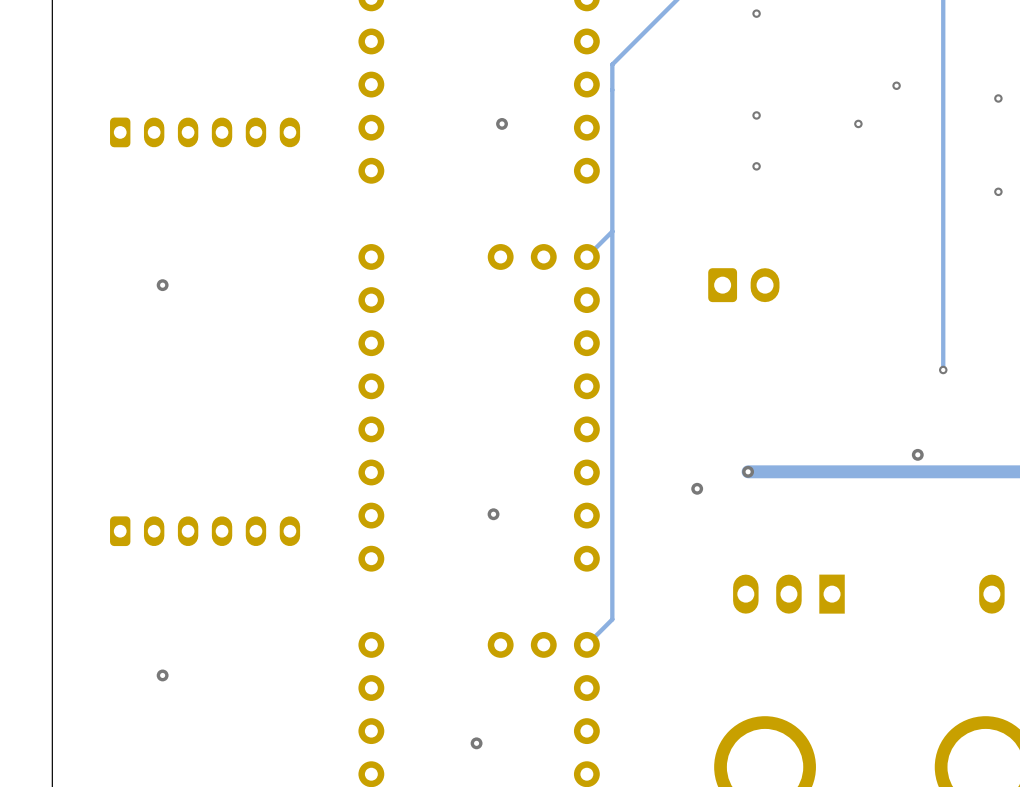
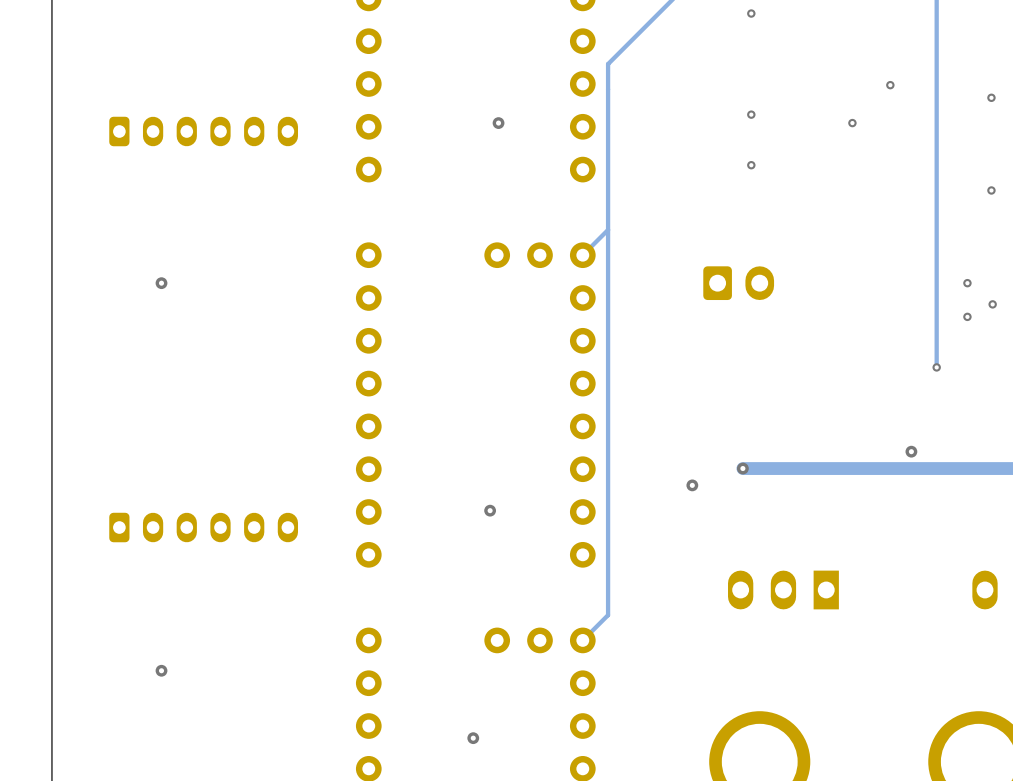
via: none -> (967, 283)
via: none -> (992, 304)
via: none -> (967, 316)

